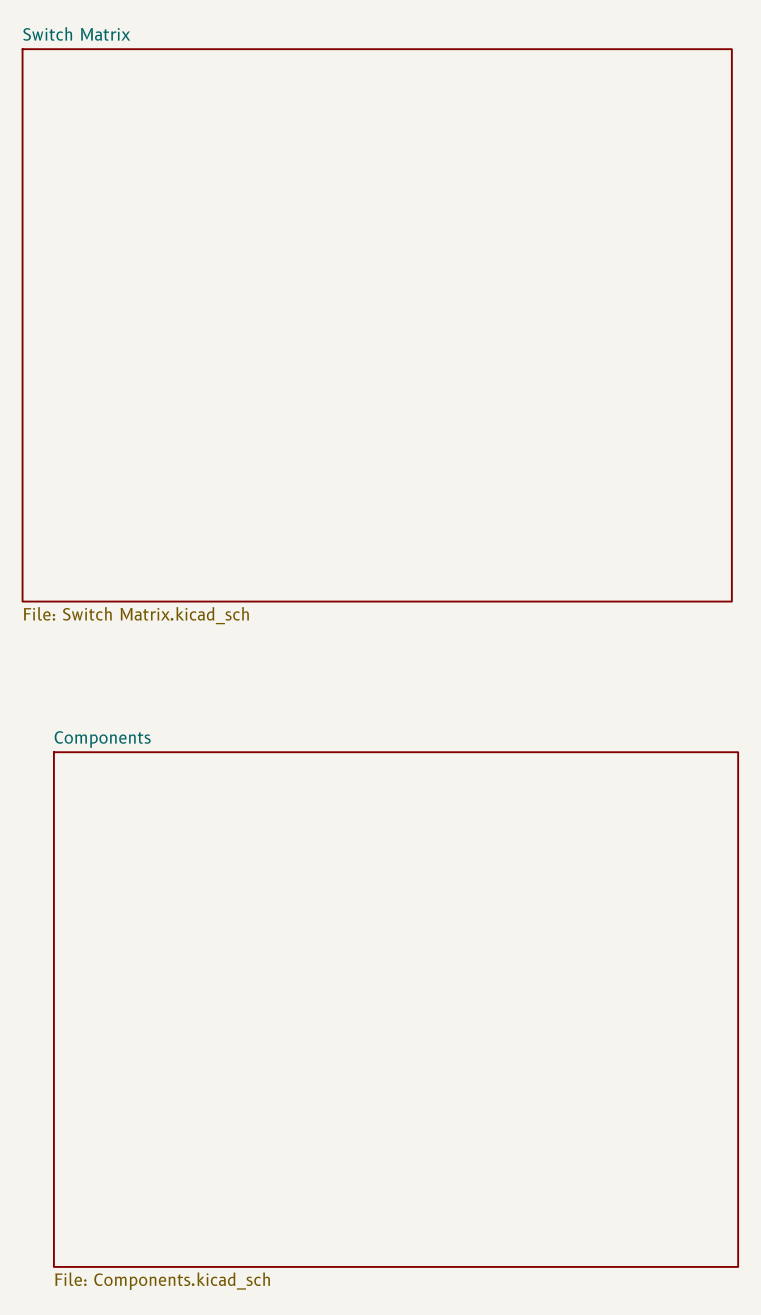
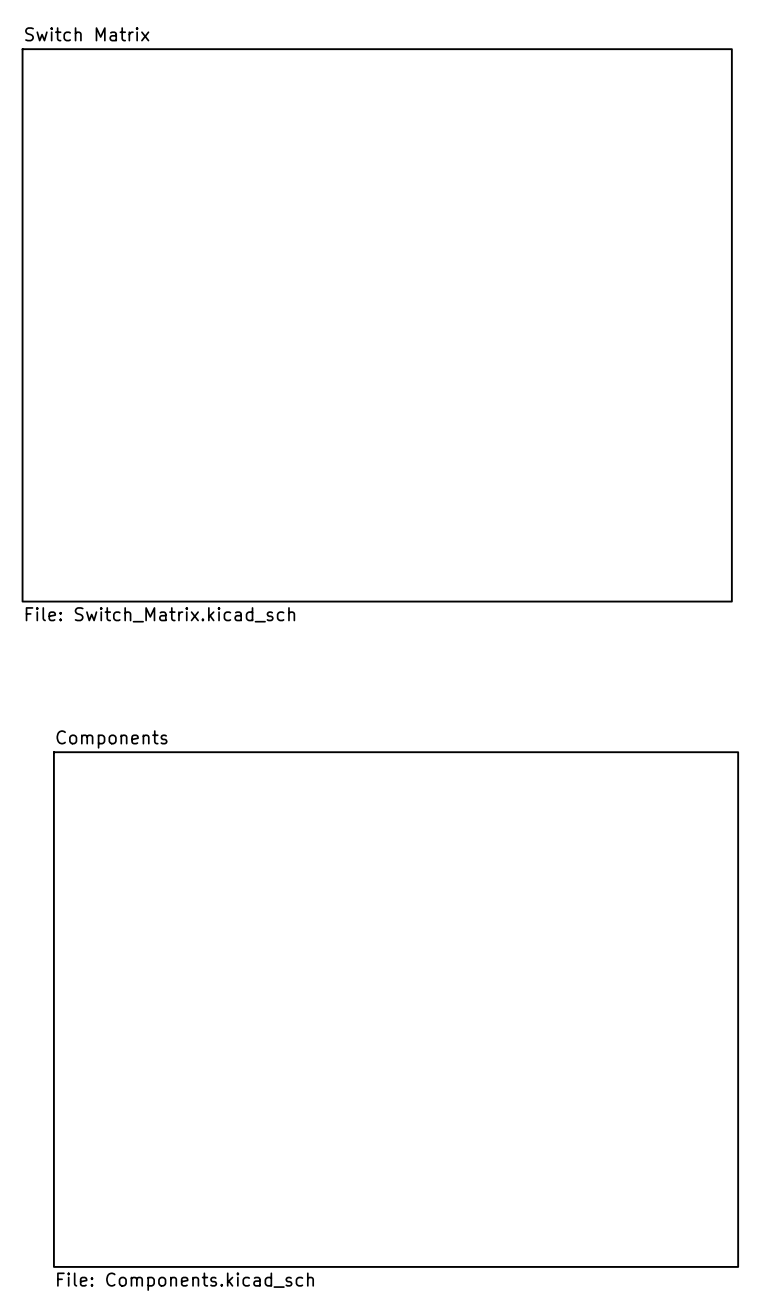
sheet Switch Matrix value: File: Switch Matrix.kicad_sch (136, 615) -> File: Switch_Matrix.kicad_sch (160, 614)

